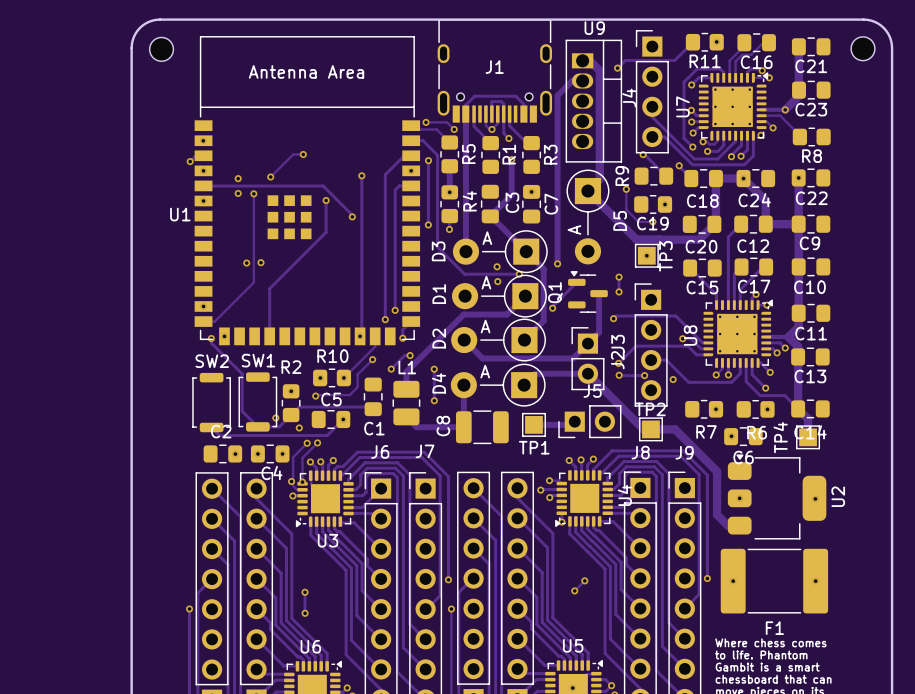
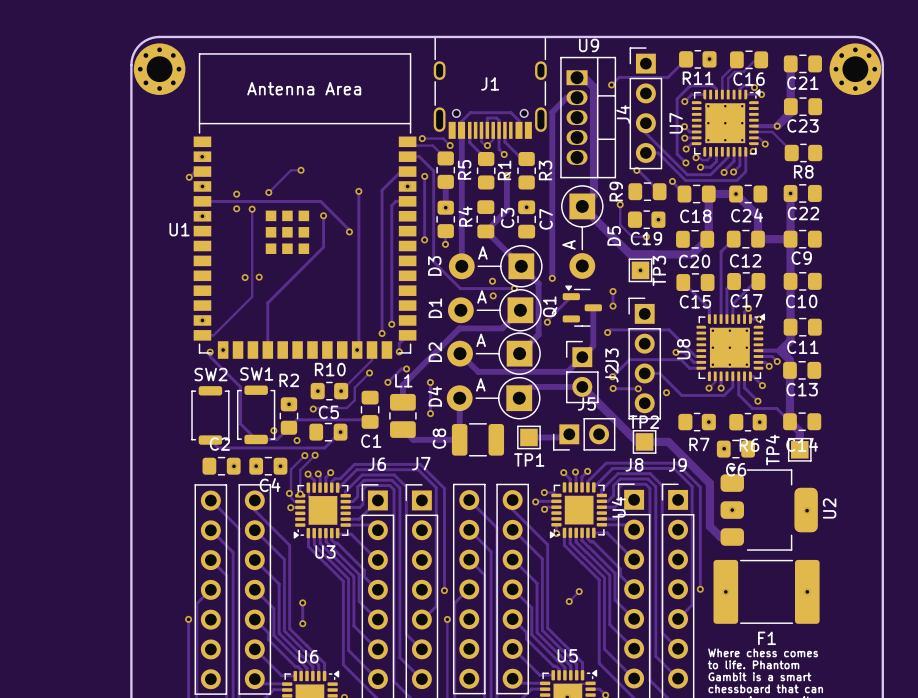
part footprint: [851, 36, 875, 61] -> [829, 43, 882, 96]
part footprint: [149, 37, 174, 62] -> [133, 43, 186, 95]

